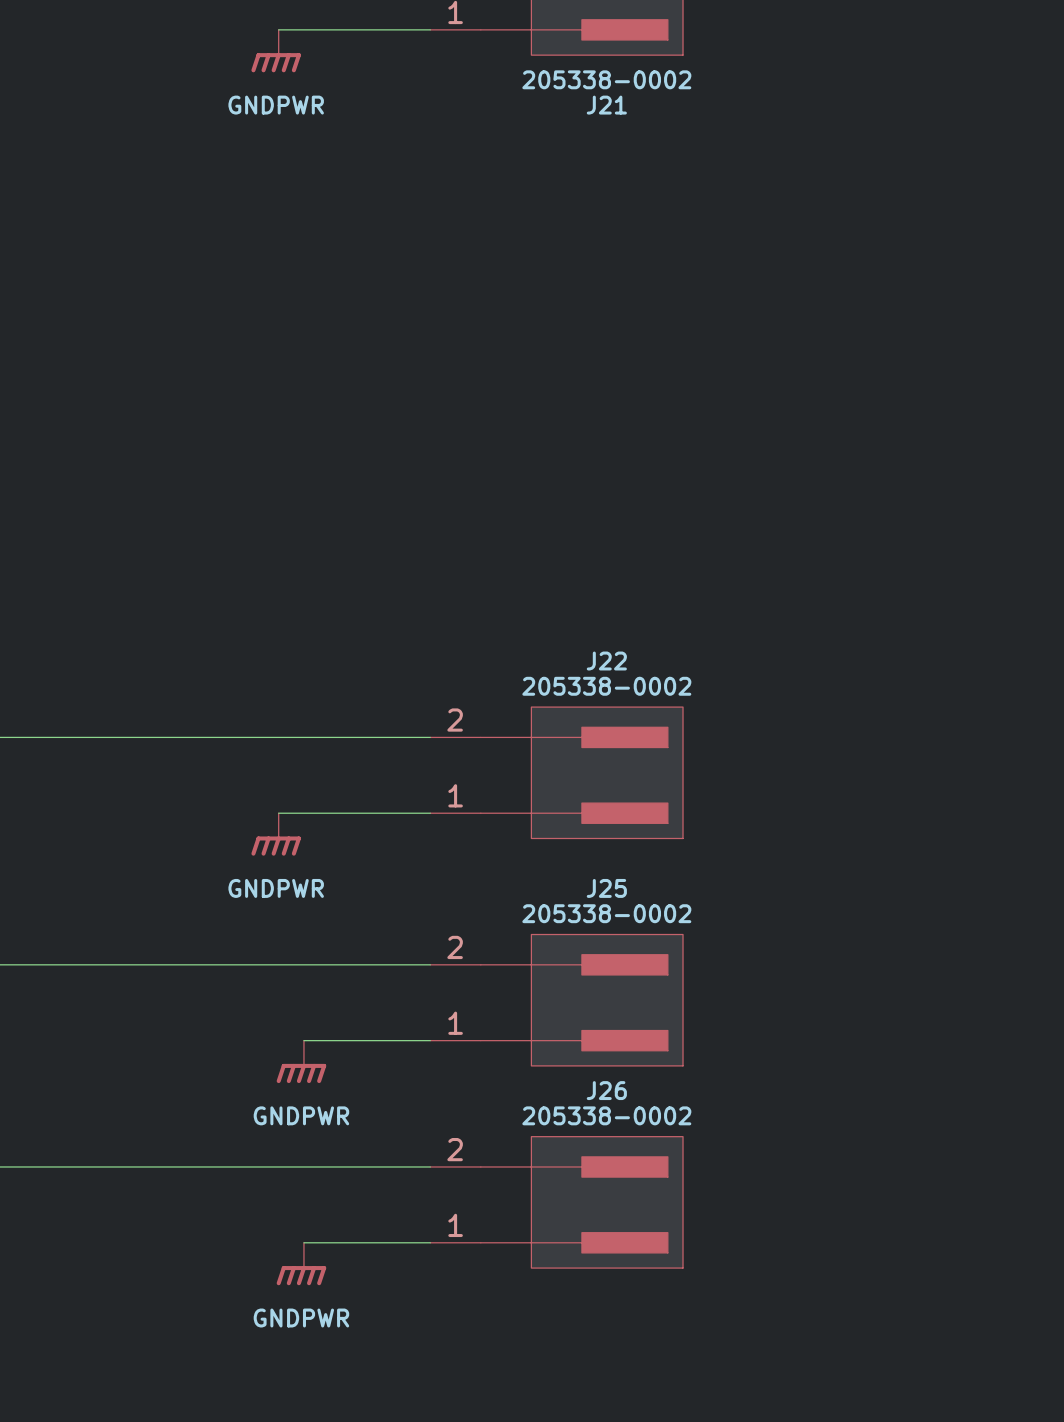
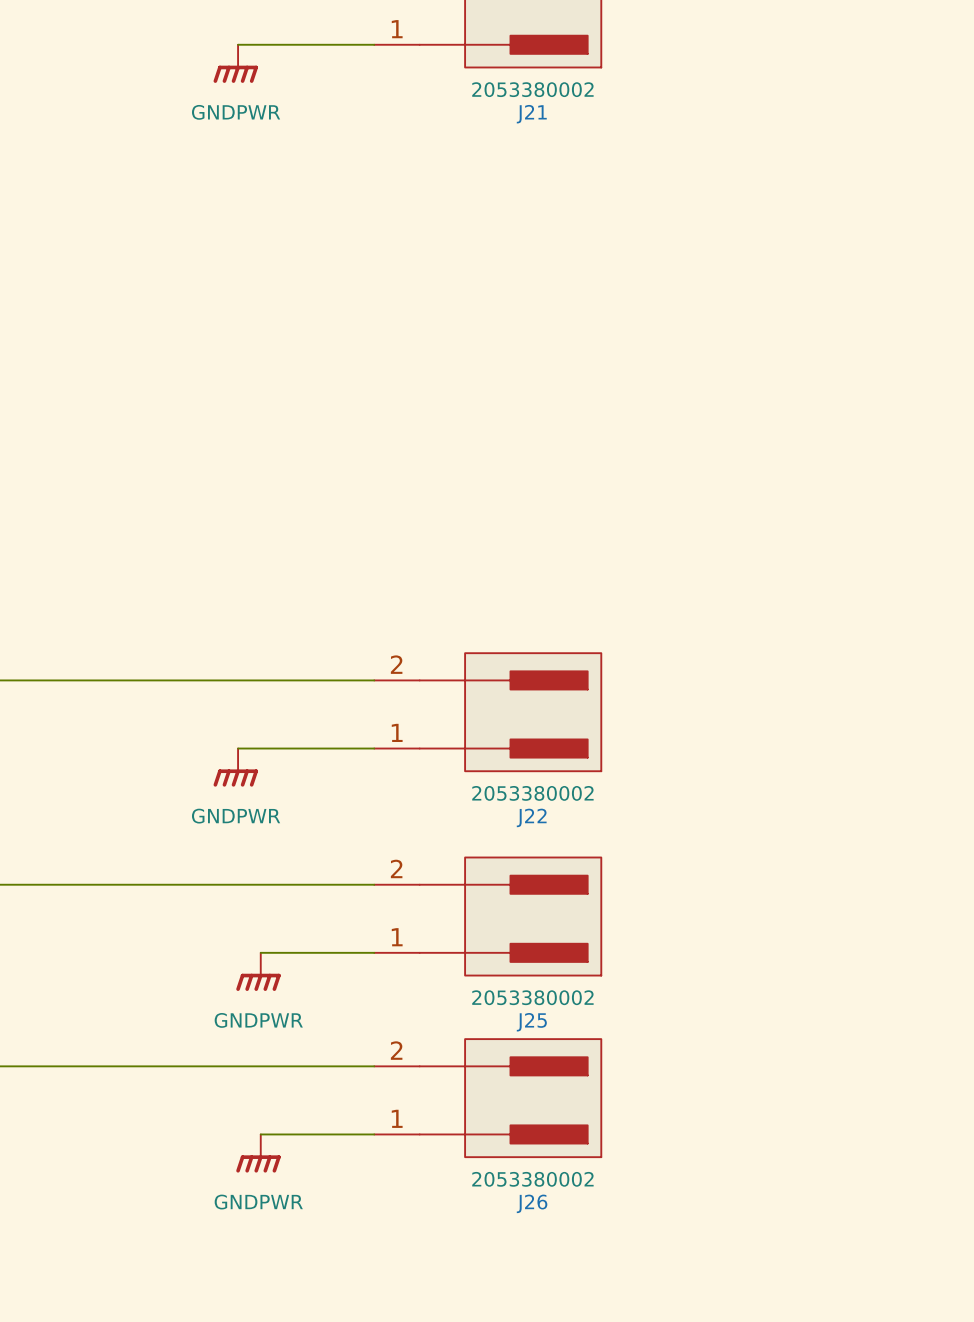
J21 value: 205338-0002 (606, 79) -> 2053380002 (532, 89)
J22 name position: J22 (606, 661) -> J22 (531, 817)
J22 value: 205338-0002 (606, 686) -> 2053380002 (532, 793)
J25 name position: J25 (606, 888) -> J25 (531, 1022)
J25 value: 205338-0002 (606, 913) -> 2053380002 (532, 997)
J26 name position: J26 (606, 1090) -> J26 (532, 1203)
J26 value: 205338-0002 (606, 1115) -> 2053380002 (532, 1179)

